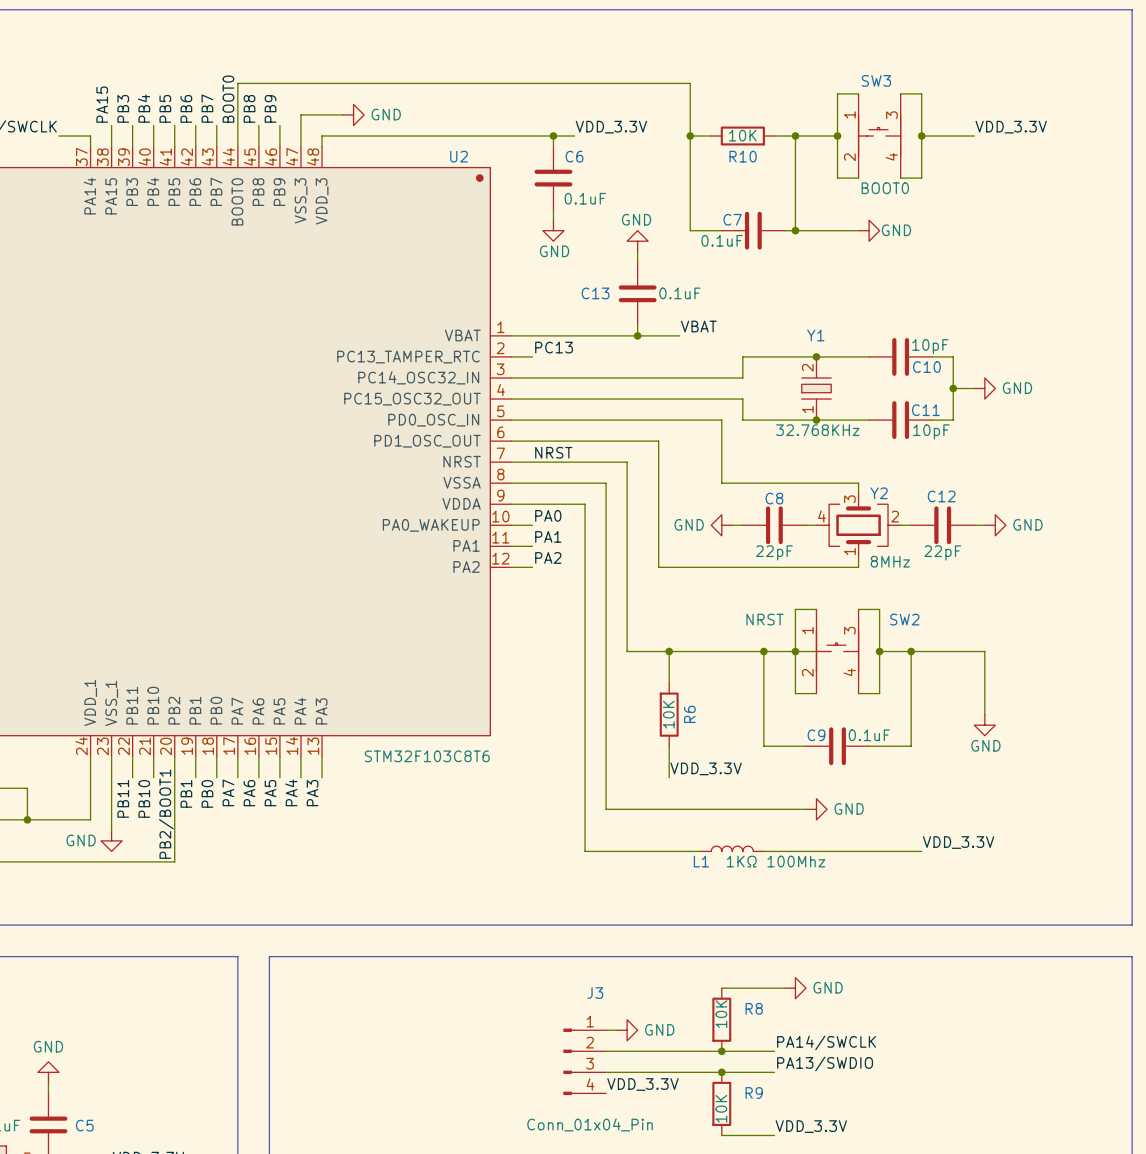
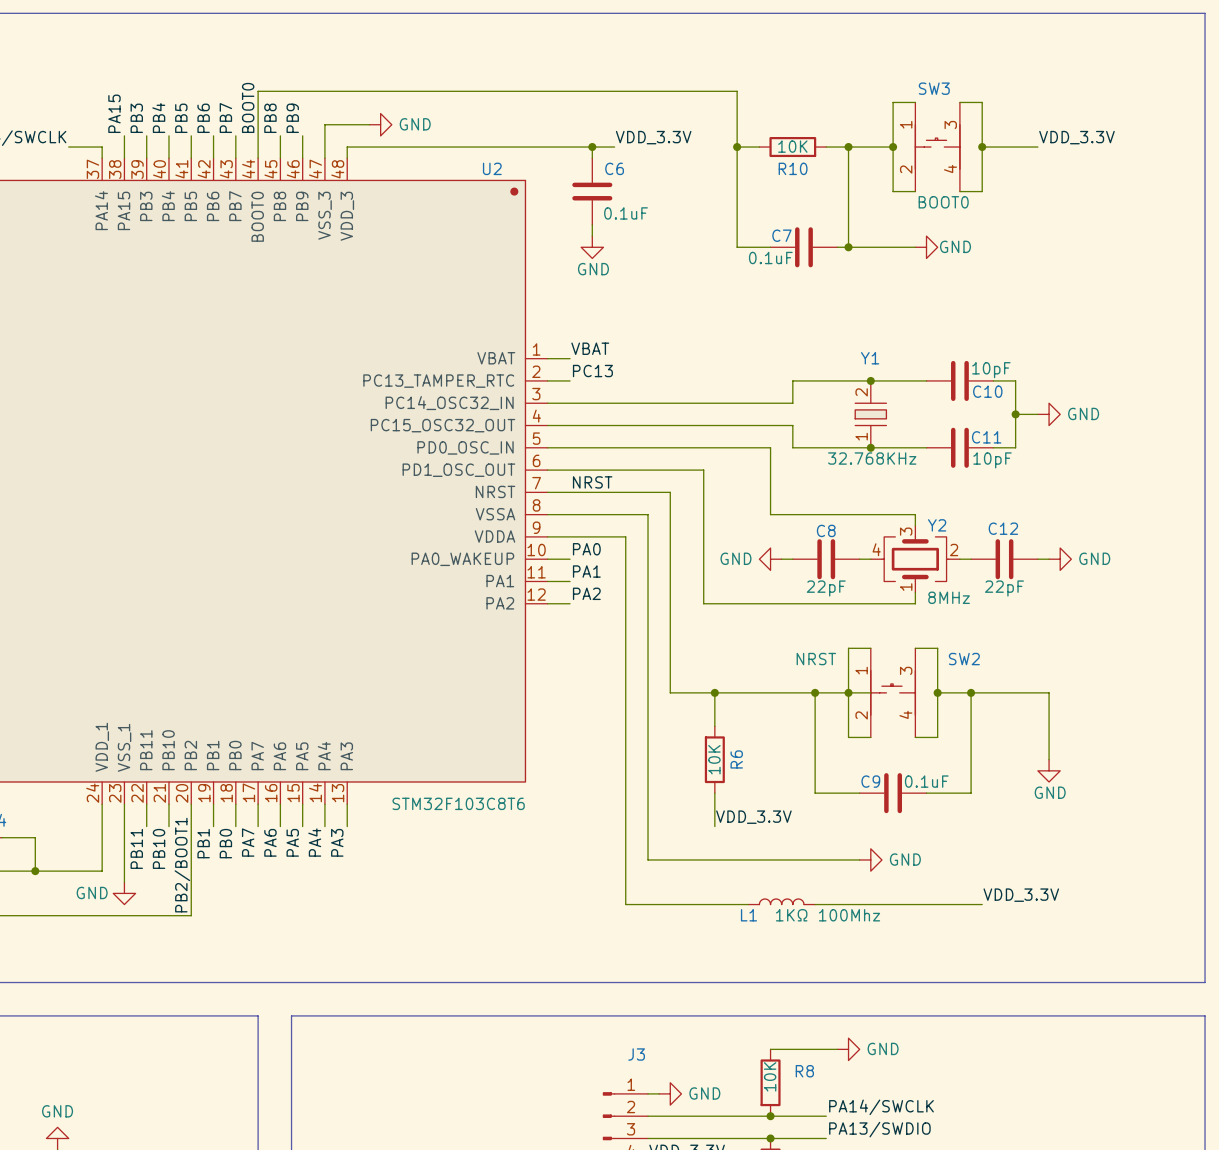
power symbol: GND (637, 241) -> none
wire: (637, 251) (637, 262) -> none
C13: 0.1uF (637, 293) -> none
wire: (637, 325) (637, 335) -> none
label position: VBAT (698, 326) -> VBAT (590, 348)
wire: (532, 335) (679, 335) -> none
junction: (637, 335) -> none

